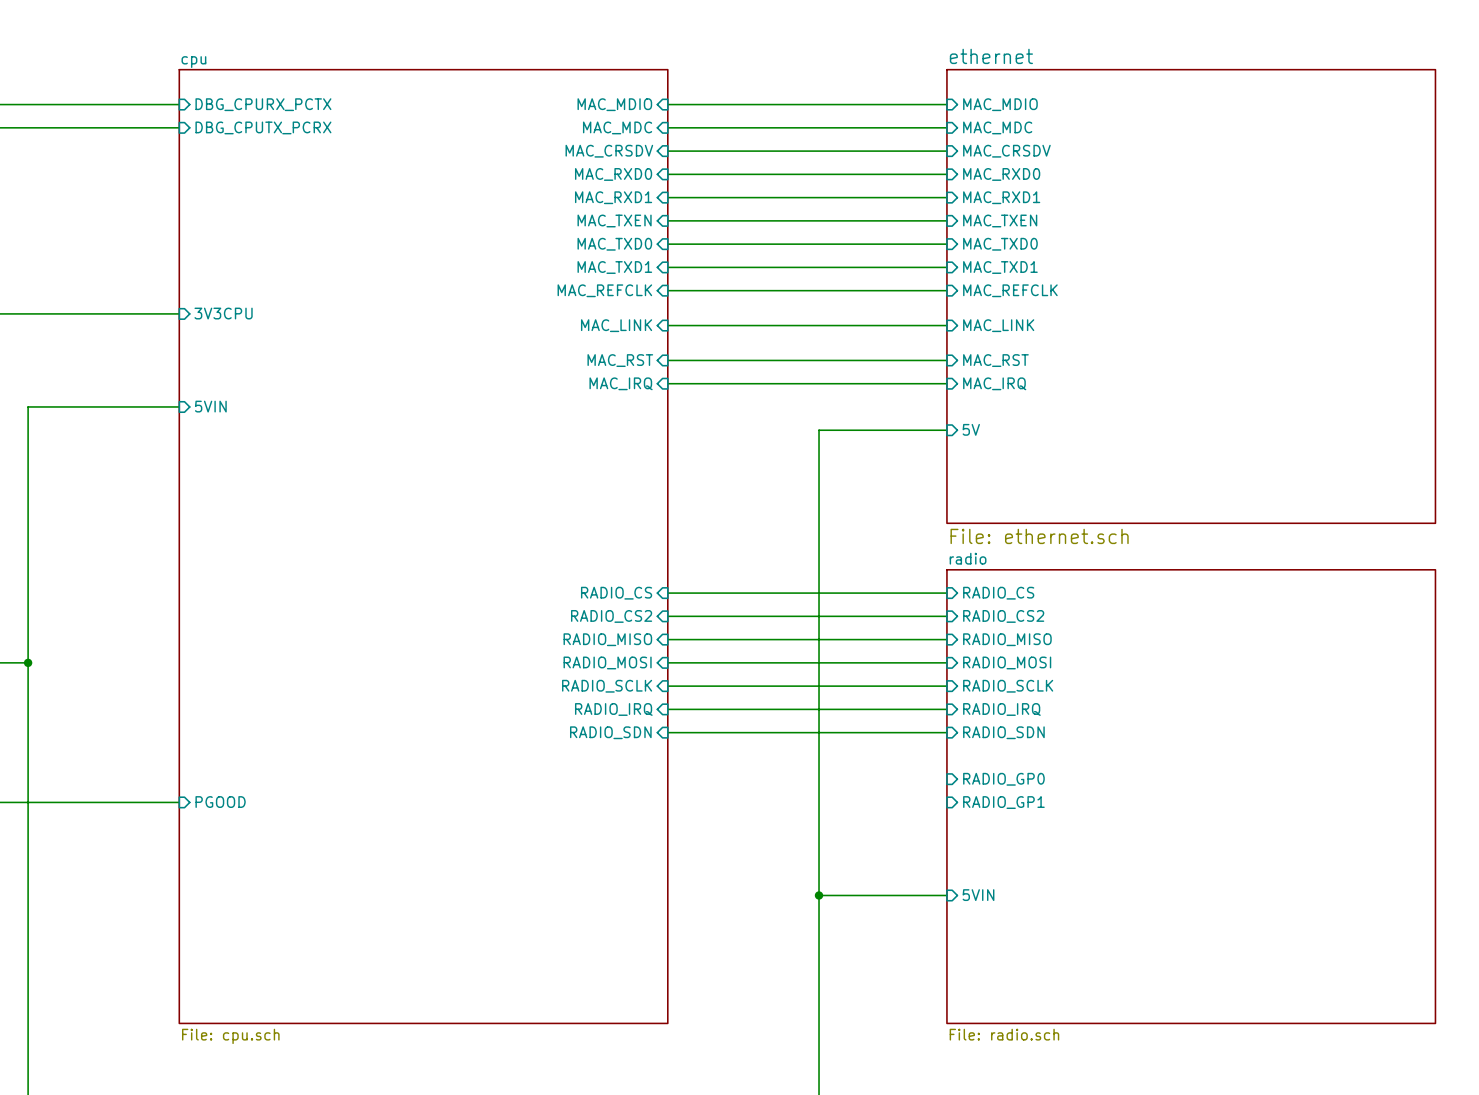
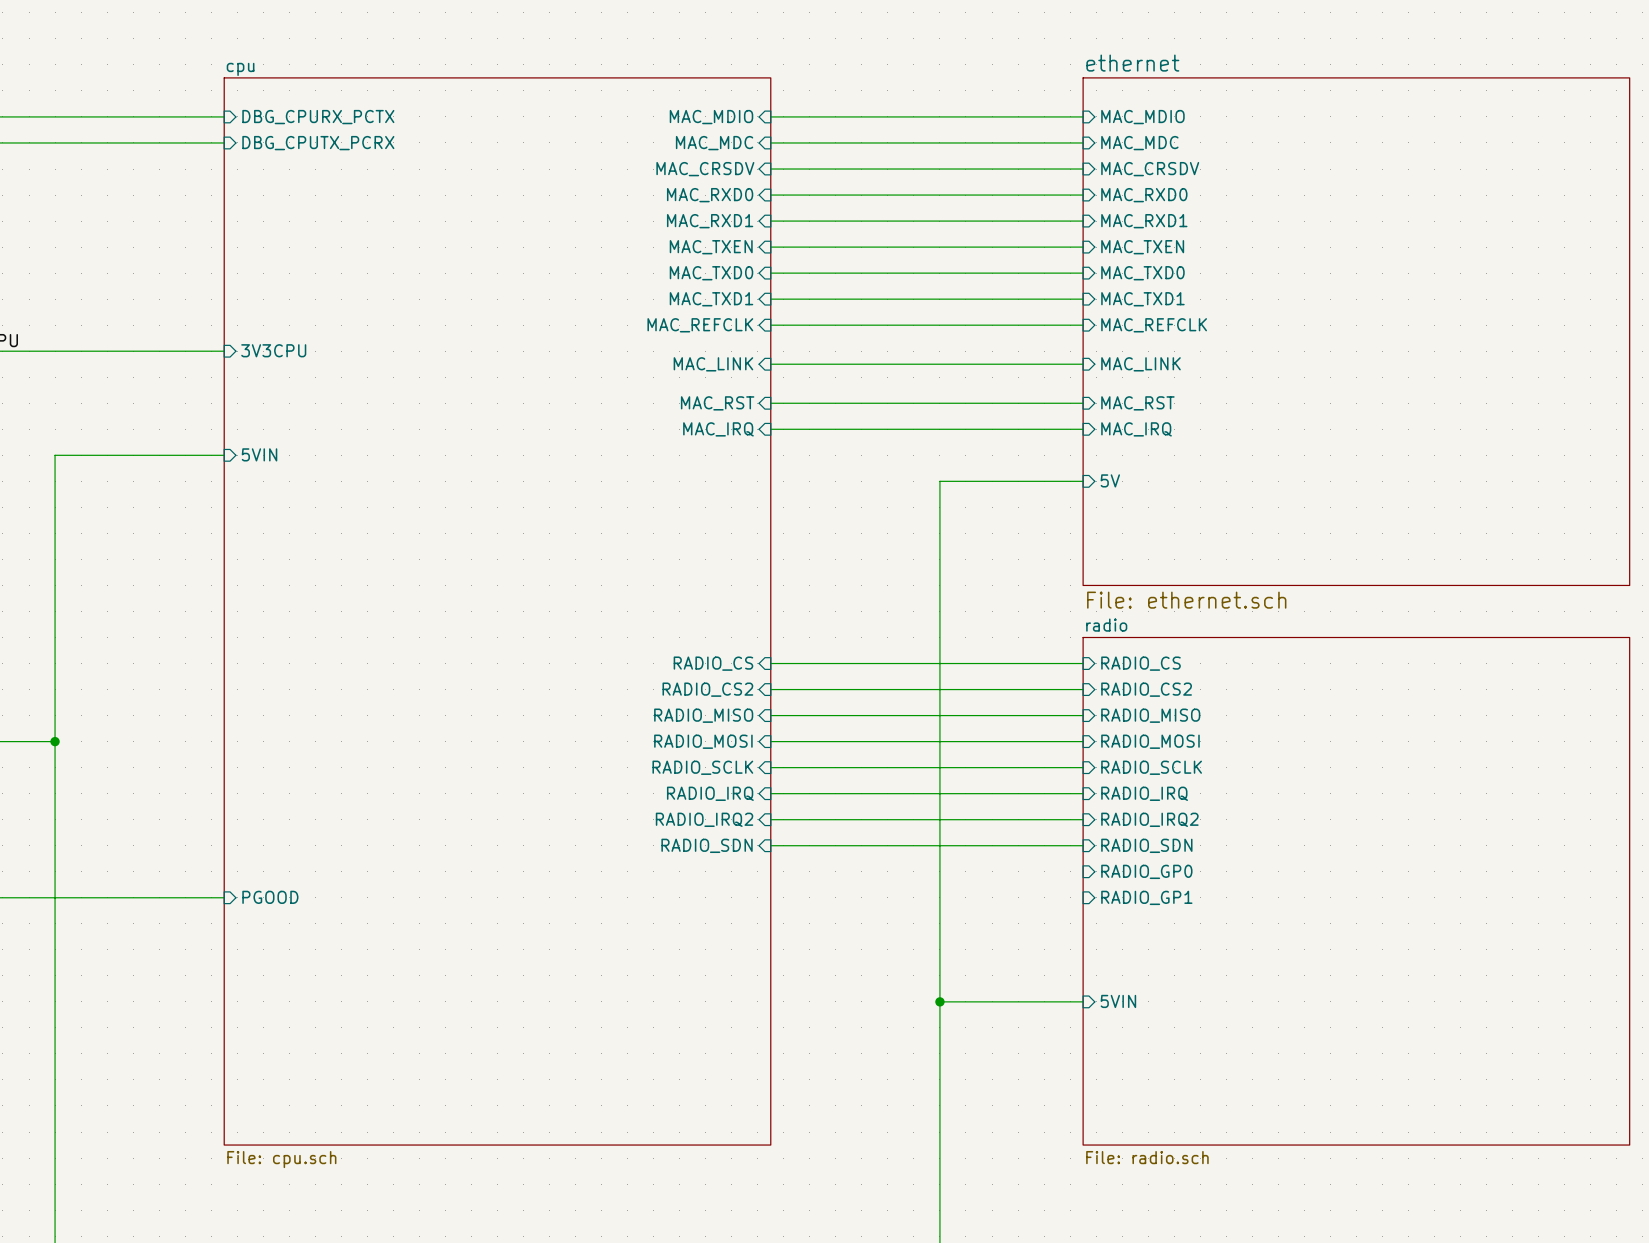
sheet pin: RADIO_SDN (610, 732) -> RADIO_IRQ2 (704, 819)
sheet pin: RADIO_SDN (1003, 732) -> RADIO_IRQ2 (1149, 819)
wire: none -> (770, 845) (1083, 845)
sheet pin: none -> RADIO_SDN (707, 845)
sheet pin: none -> RADIO_SDN (1146, 845)

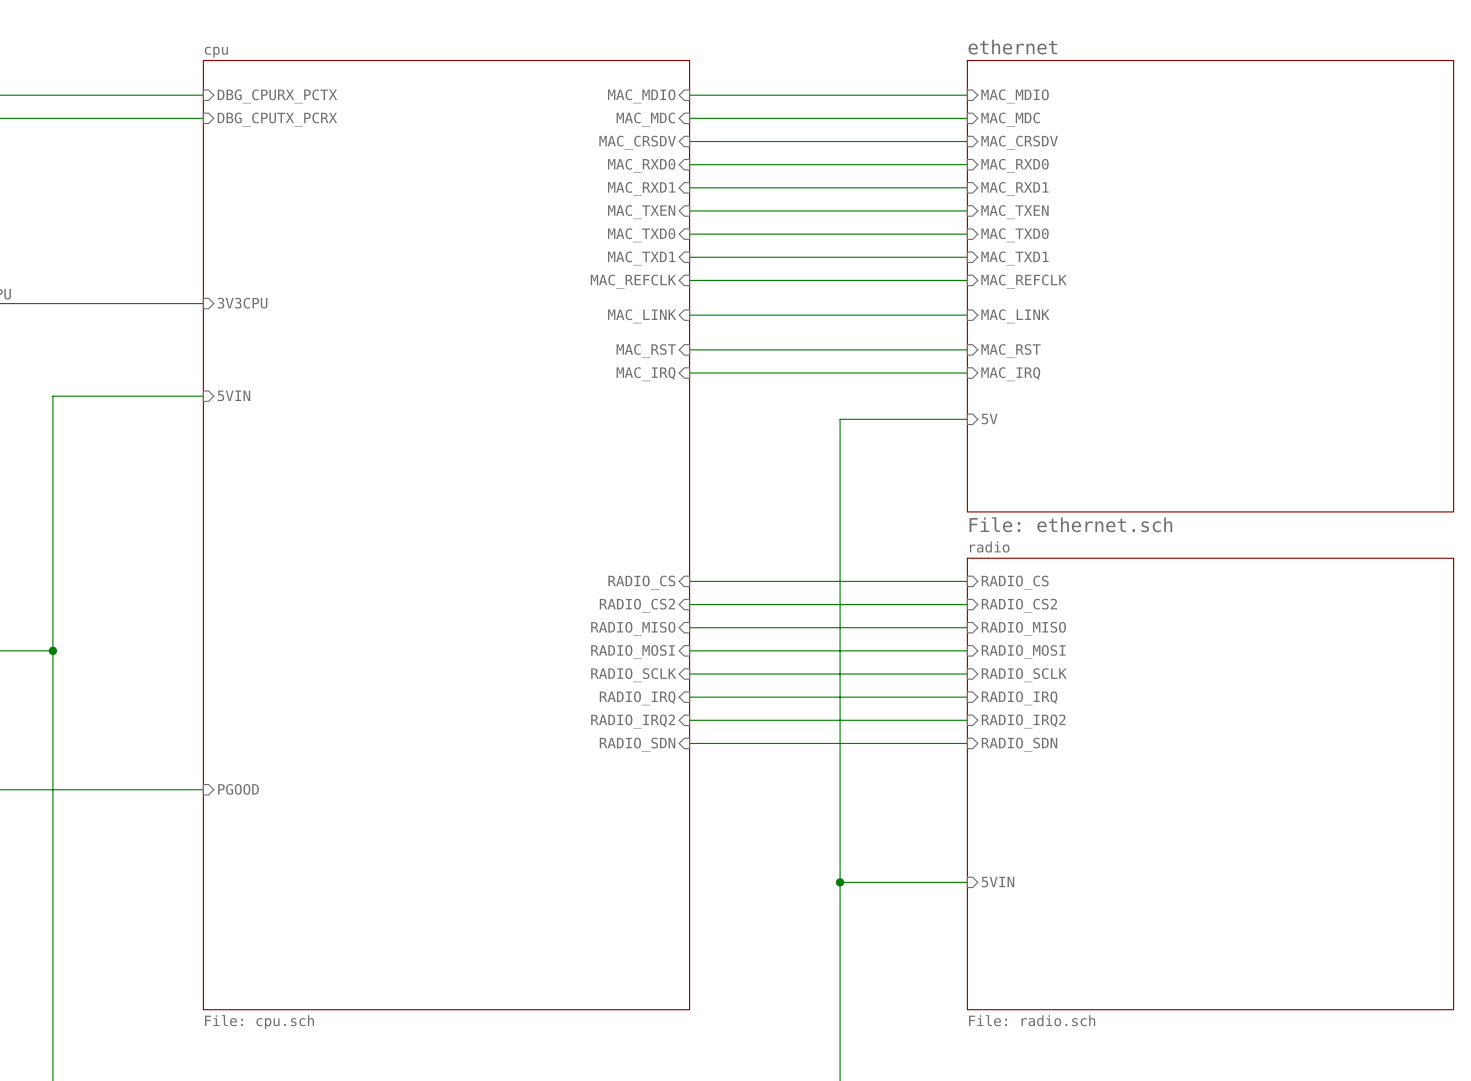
sheet pin: RADIO_GP0 (1146, 871) -> none
sheet pin: RADIO_GP1 (1146, 897) -> none

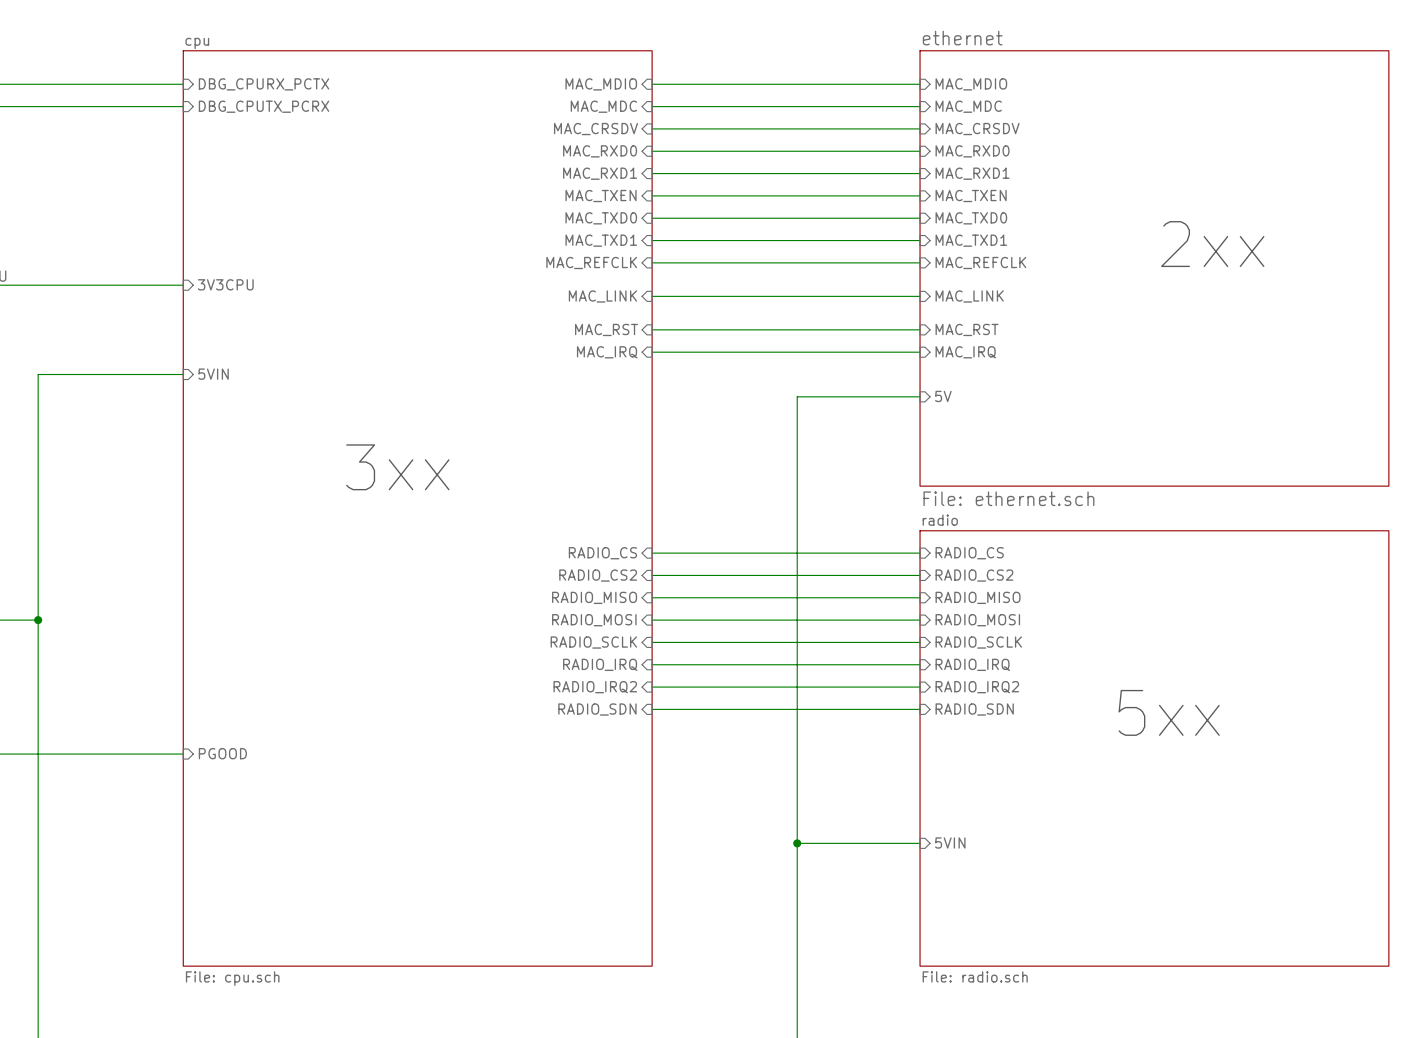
text: none -> 2xx (1212, 244)
text: none -> 3xx (397, 467)
text: none -> 5xx (1169, 712)

